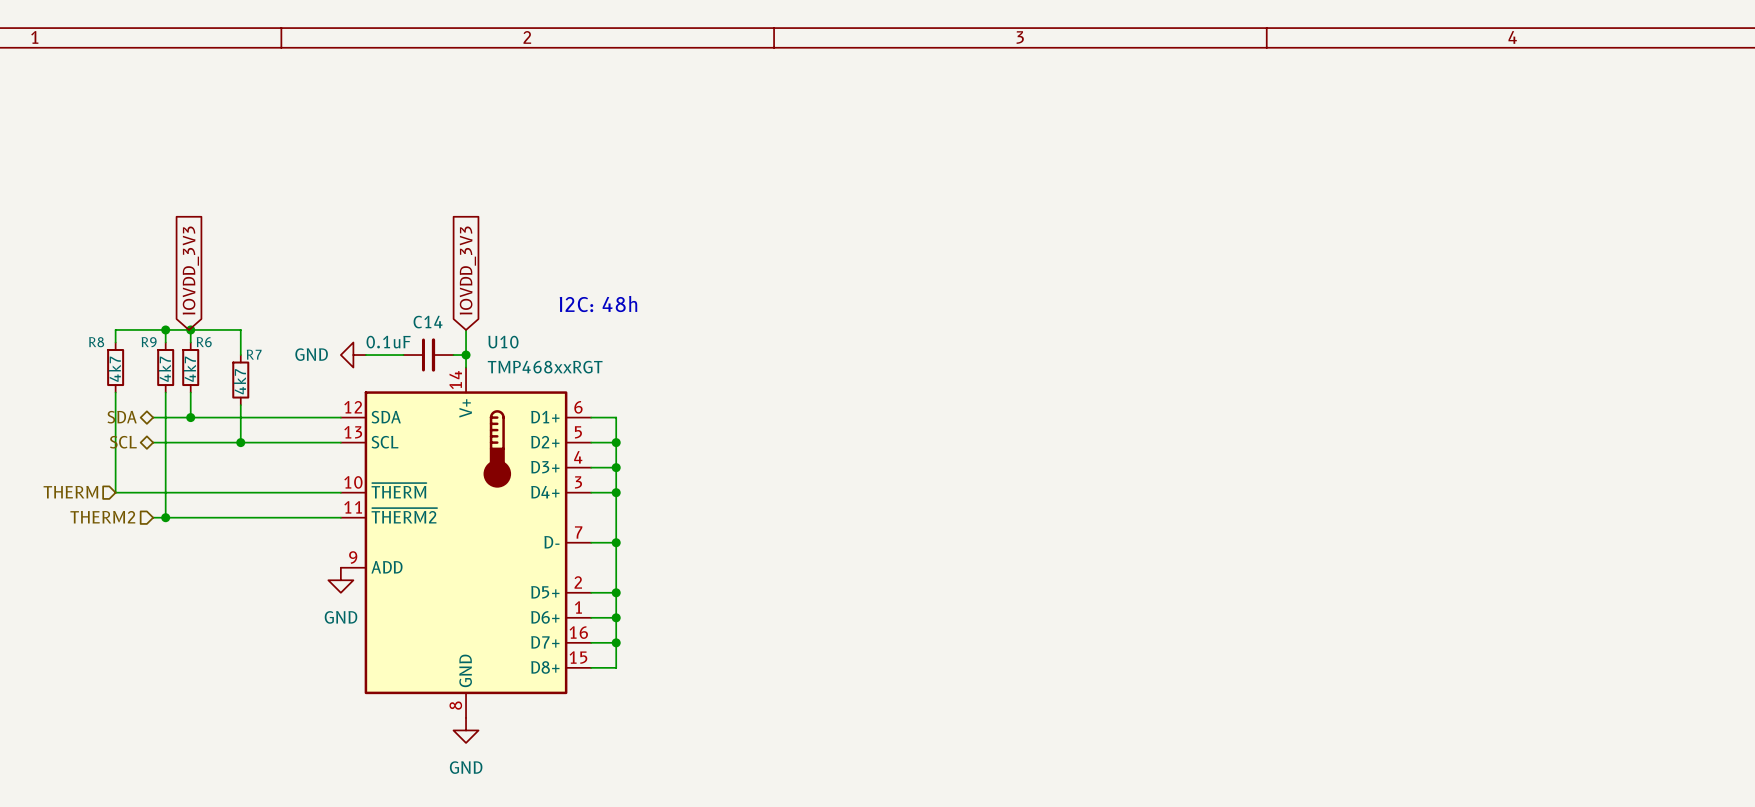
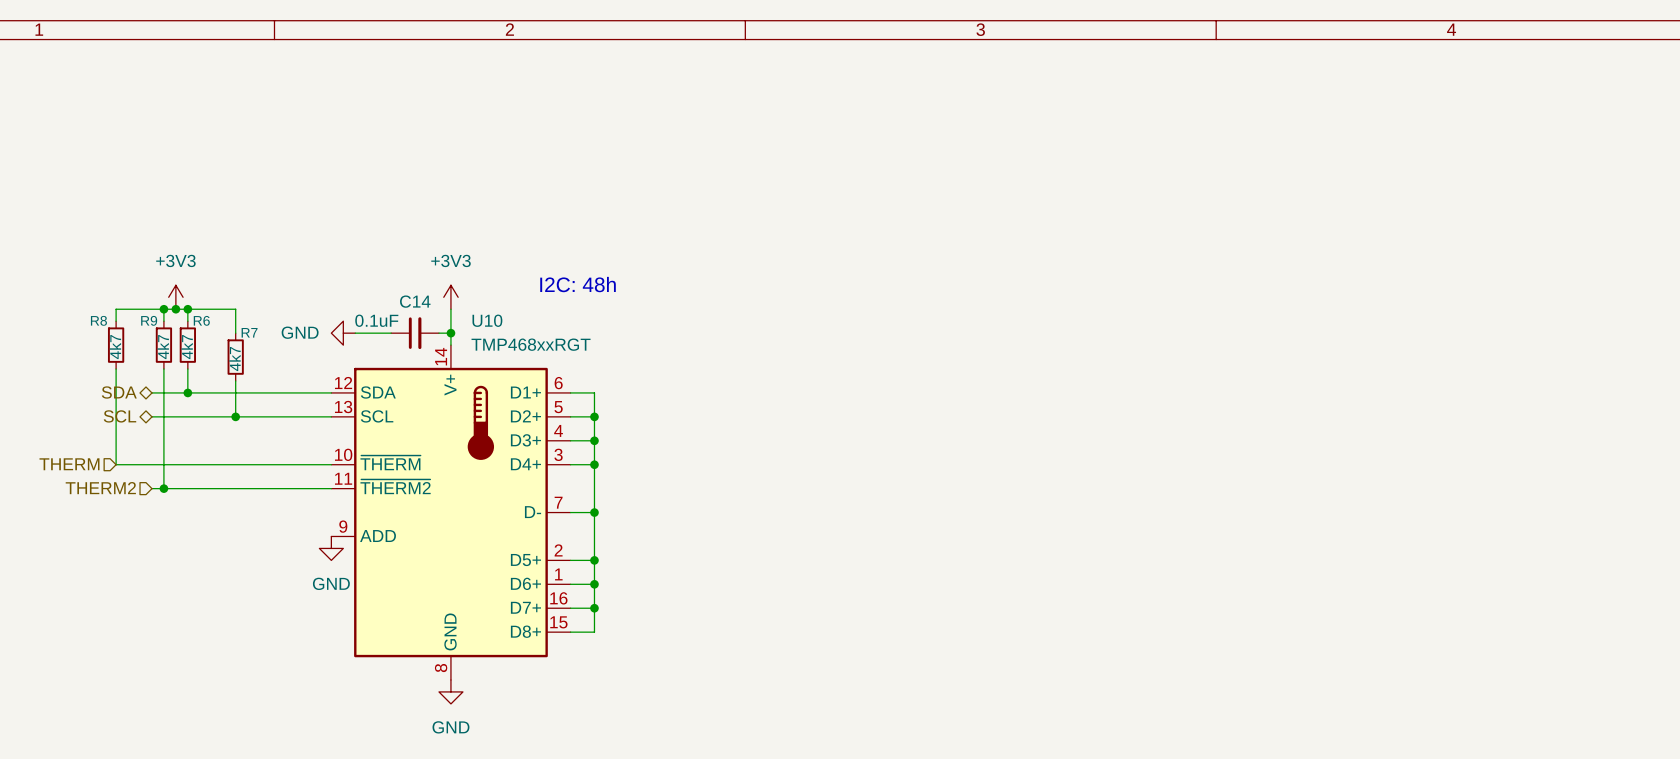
global label: IOVDD_3V3 (190, 270) -> none
global label: IOVDD_3V3 (467, 270) -> none
power symbol: none -> +3V3 (175, 297)
power symbol: none -> +3V3 (450, 297)
junction: none -> (175, 309)

